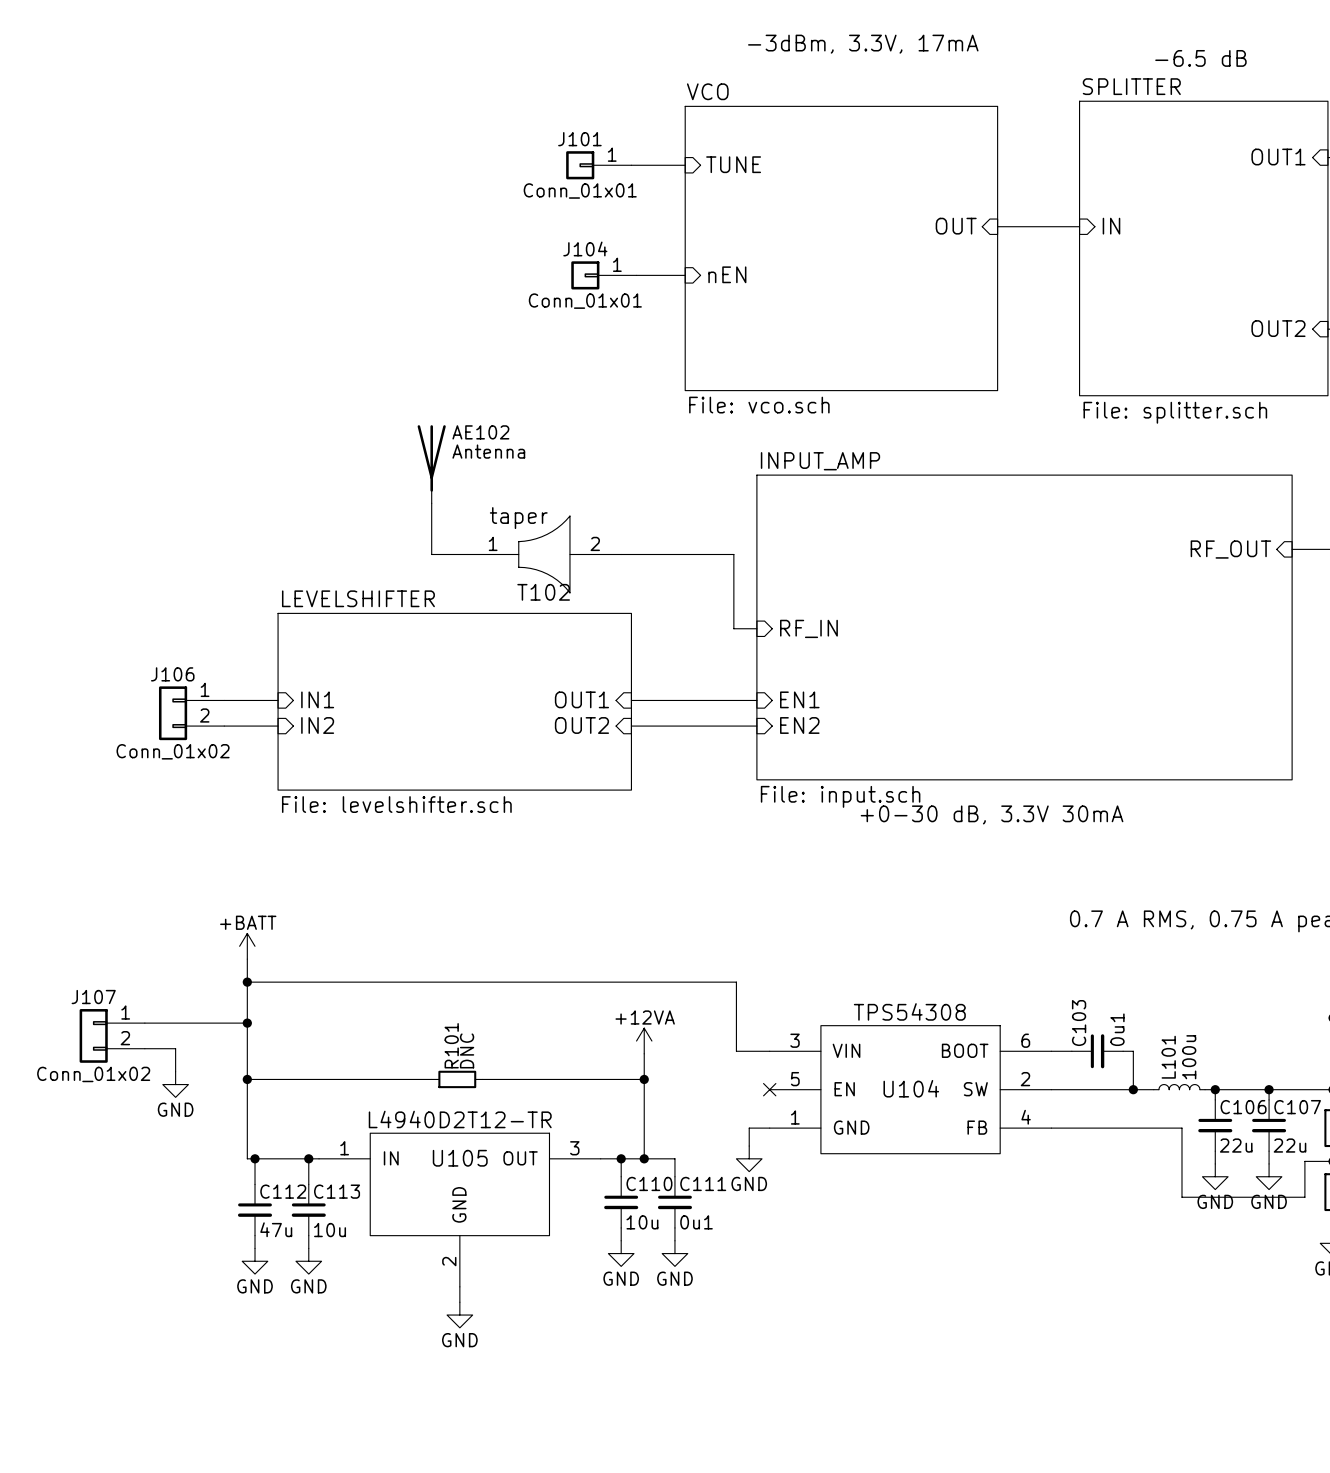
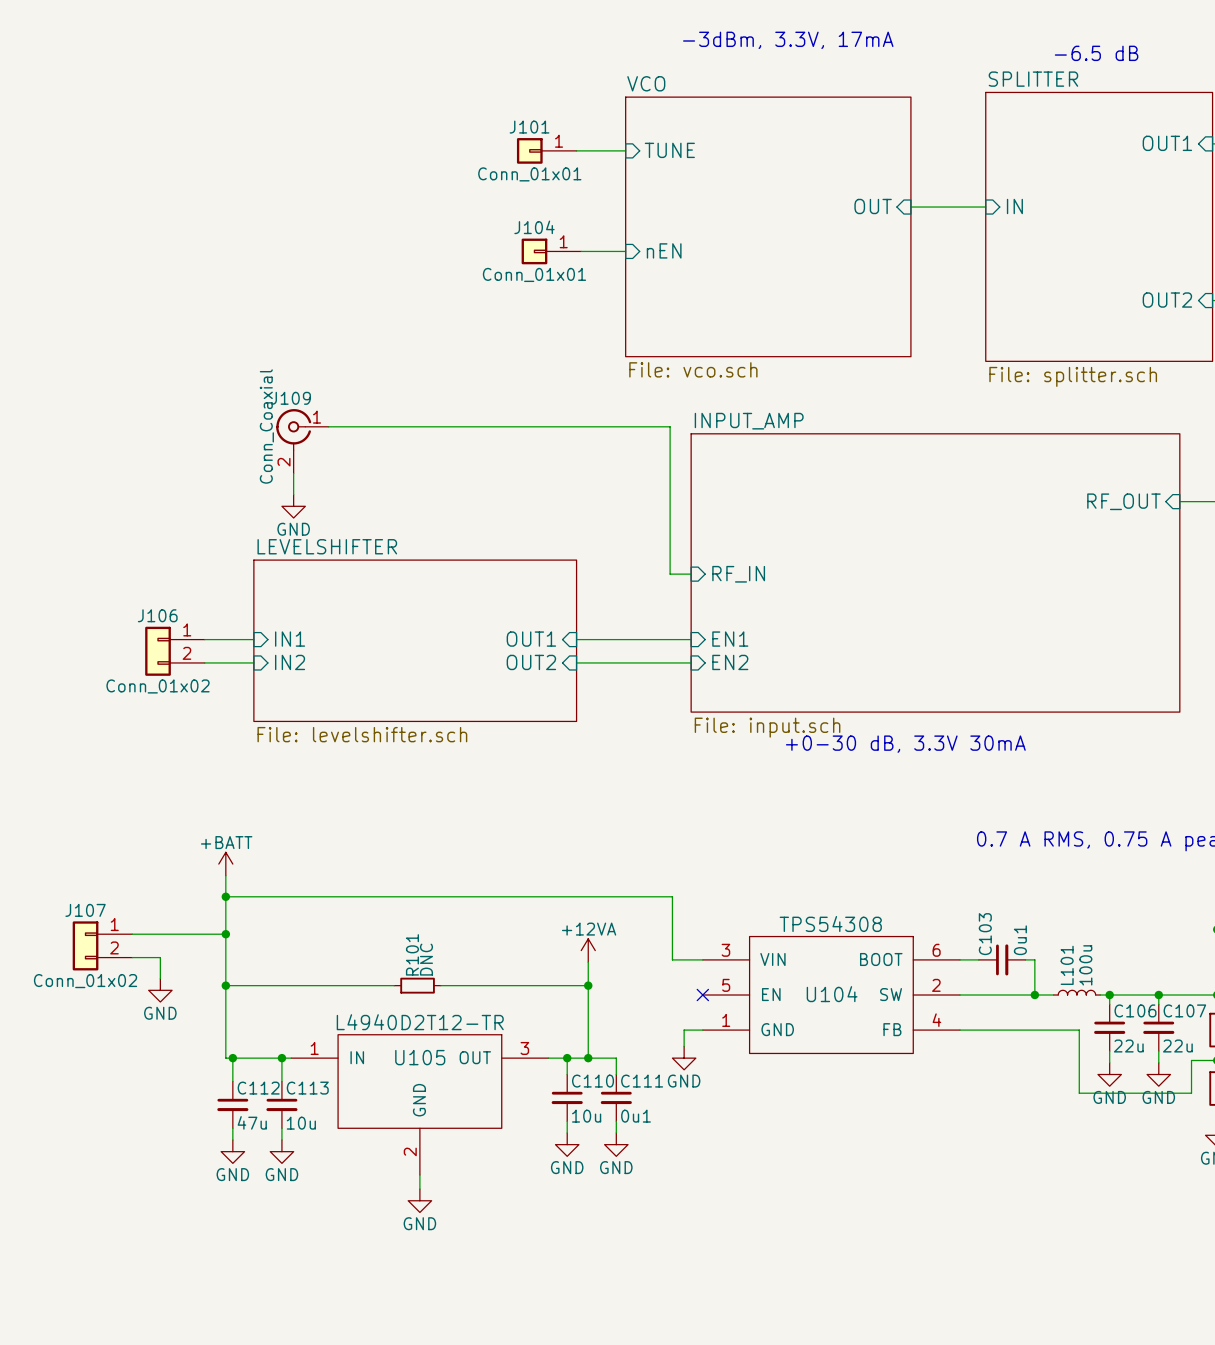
AE102: Antenna (431, 464) -> none
J109: none -> Conn_Coaxial (302, 441)
wire: (431, 503) (431, 554) (467, 554) -> none
wire: none -> (293, 473) (293, 494)
power symbol: none -> GND (293, 506)
T102: taper (544, 554) -> none
wire: (621, 554) (733, 554) -> (328, 426) (670, 426) (670, 506)

